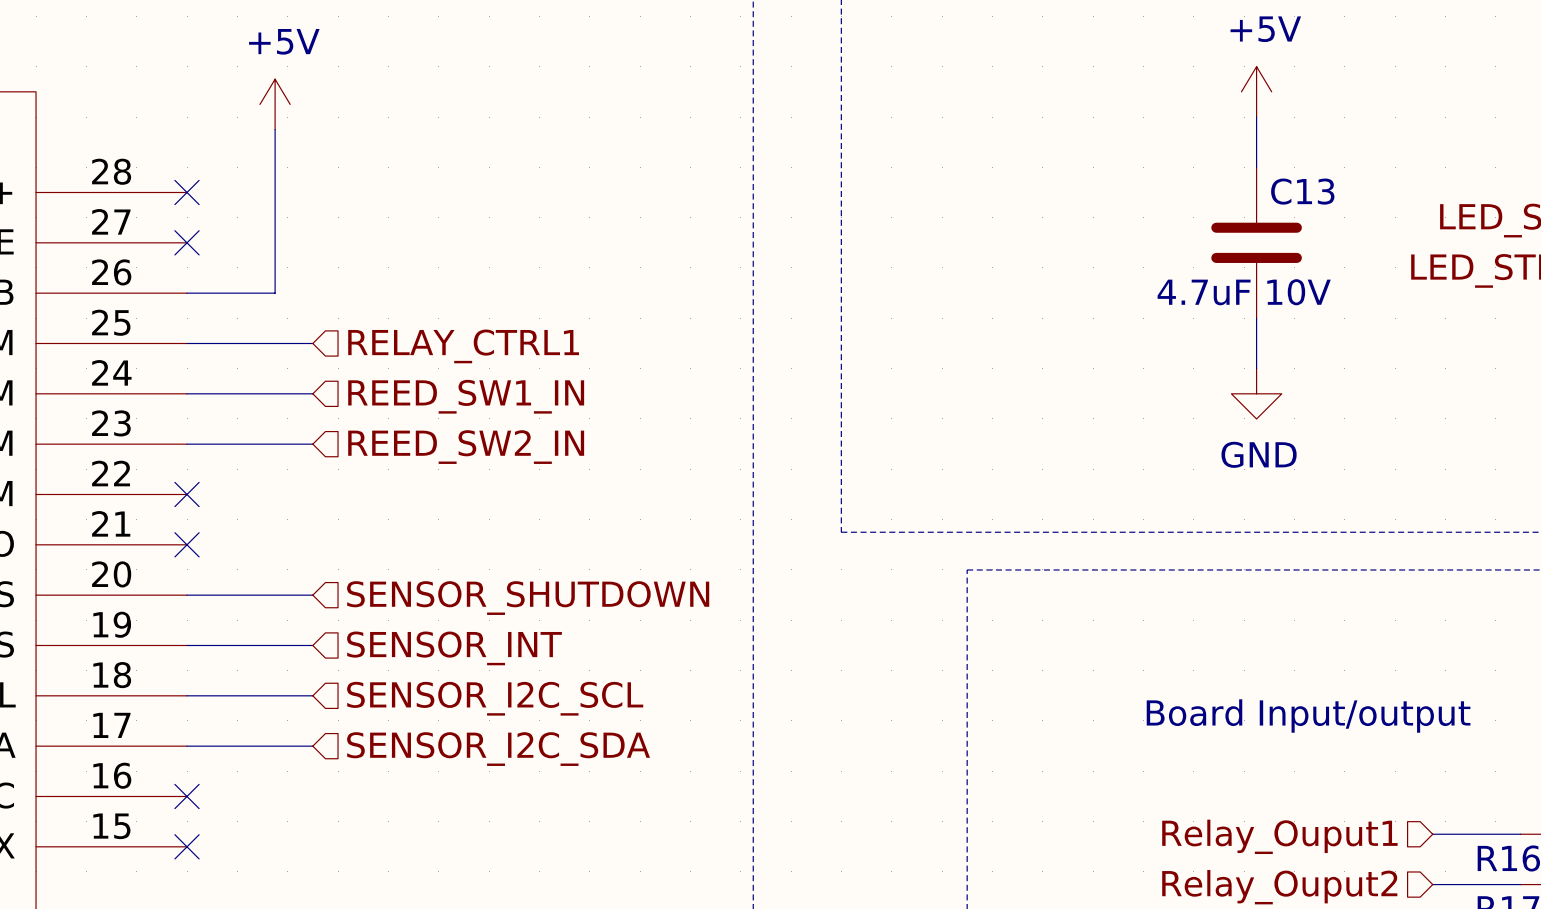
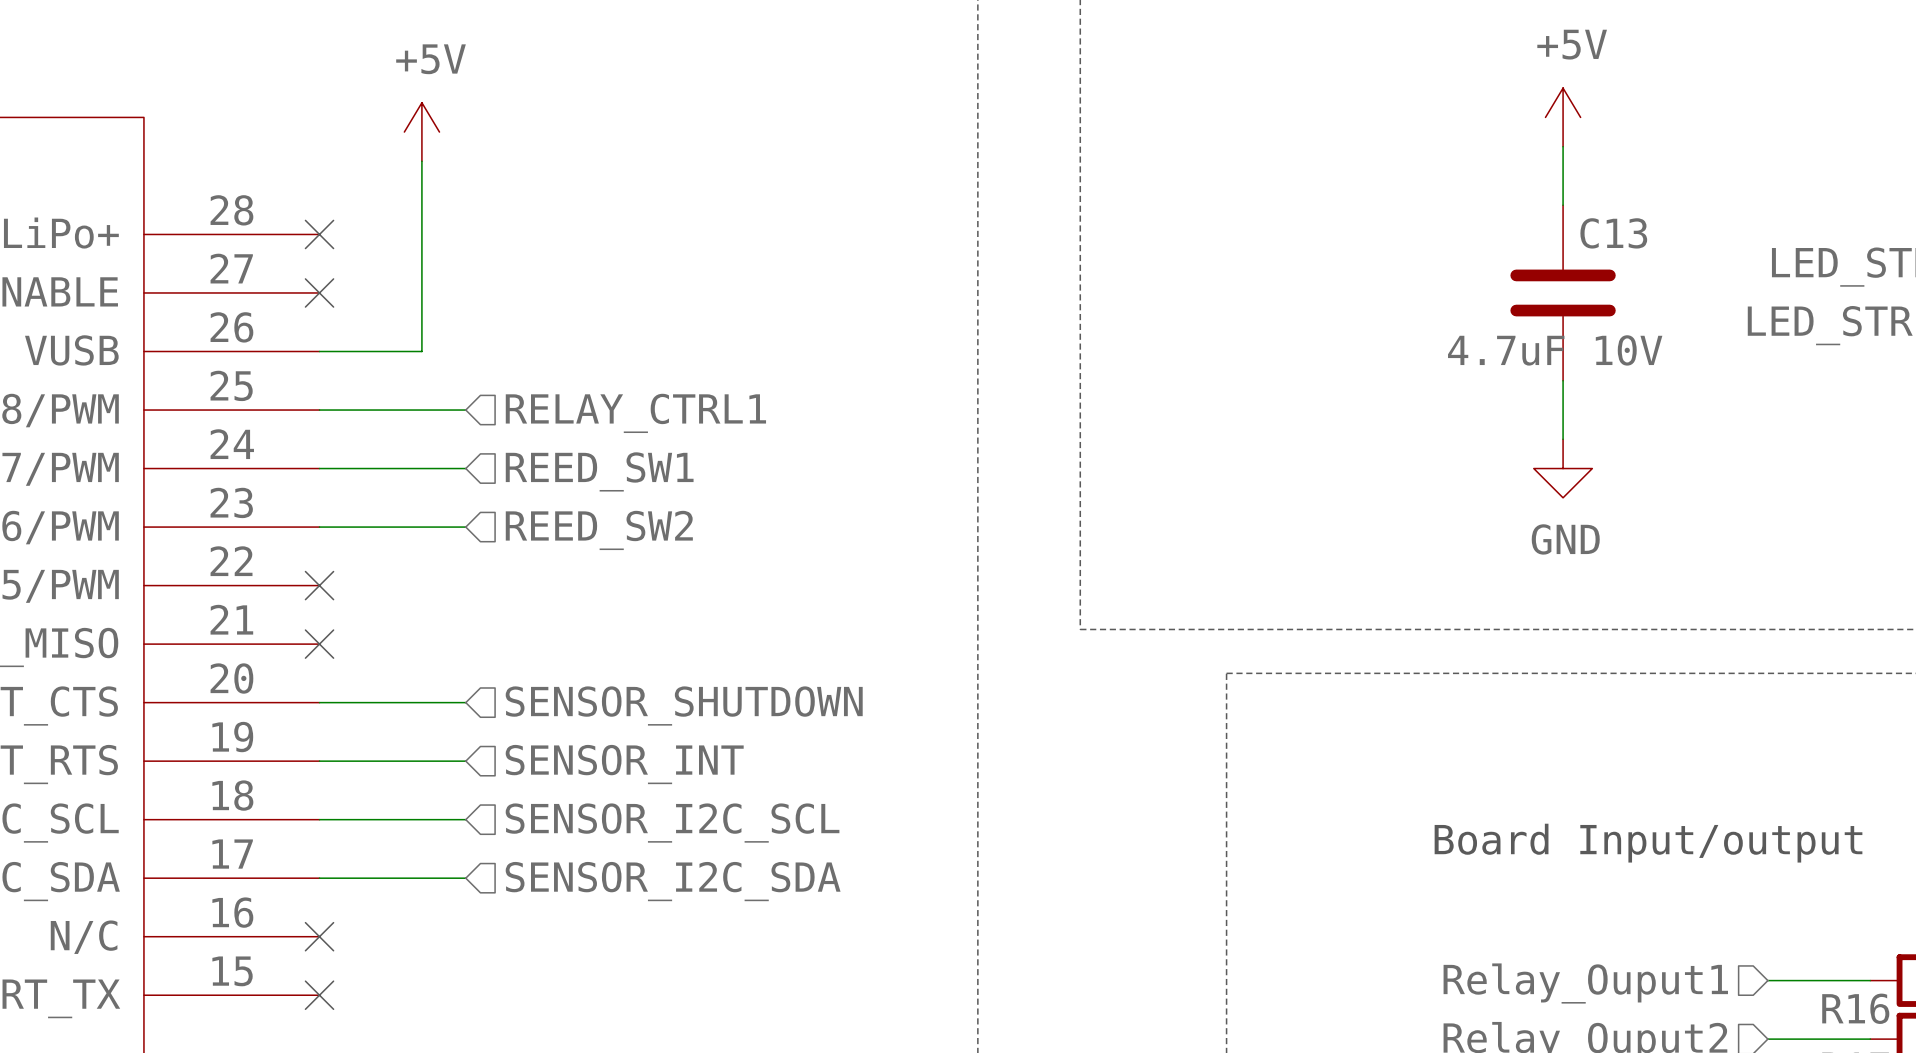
hierarchical label: REED_SW1_IN (466, 396) -> REED_SW1 (599, 471)
hierarchical label: REED_SW2_IN (466, 447) -> REED_SW2 (599, 530)

